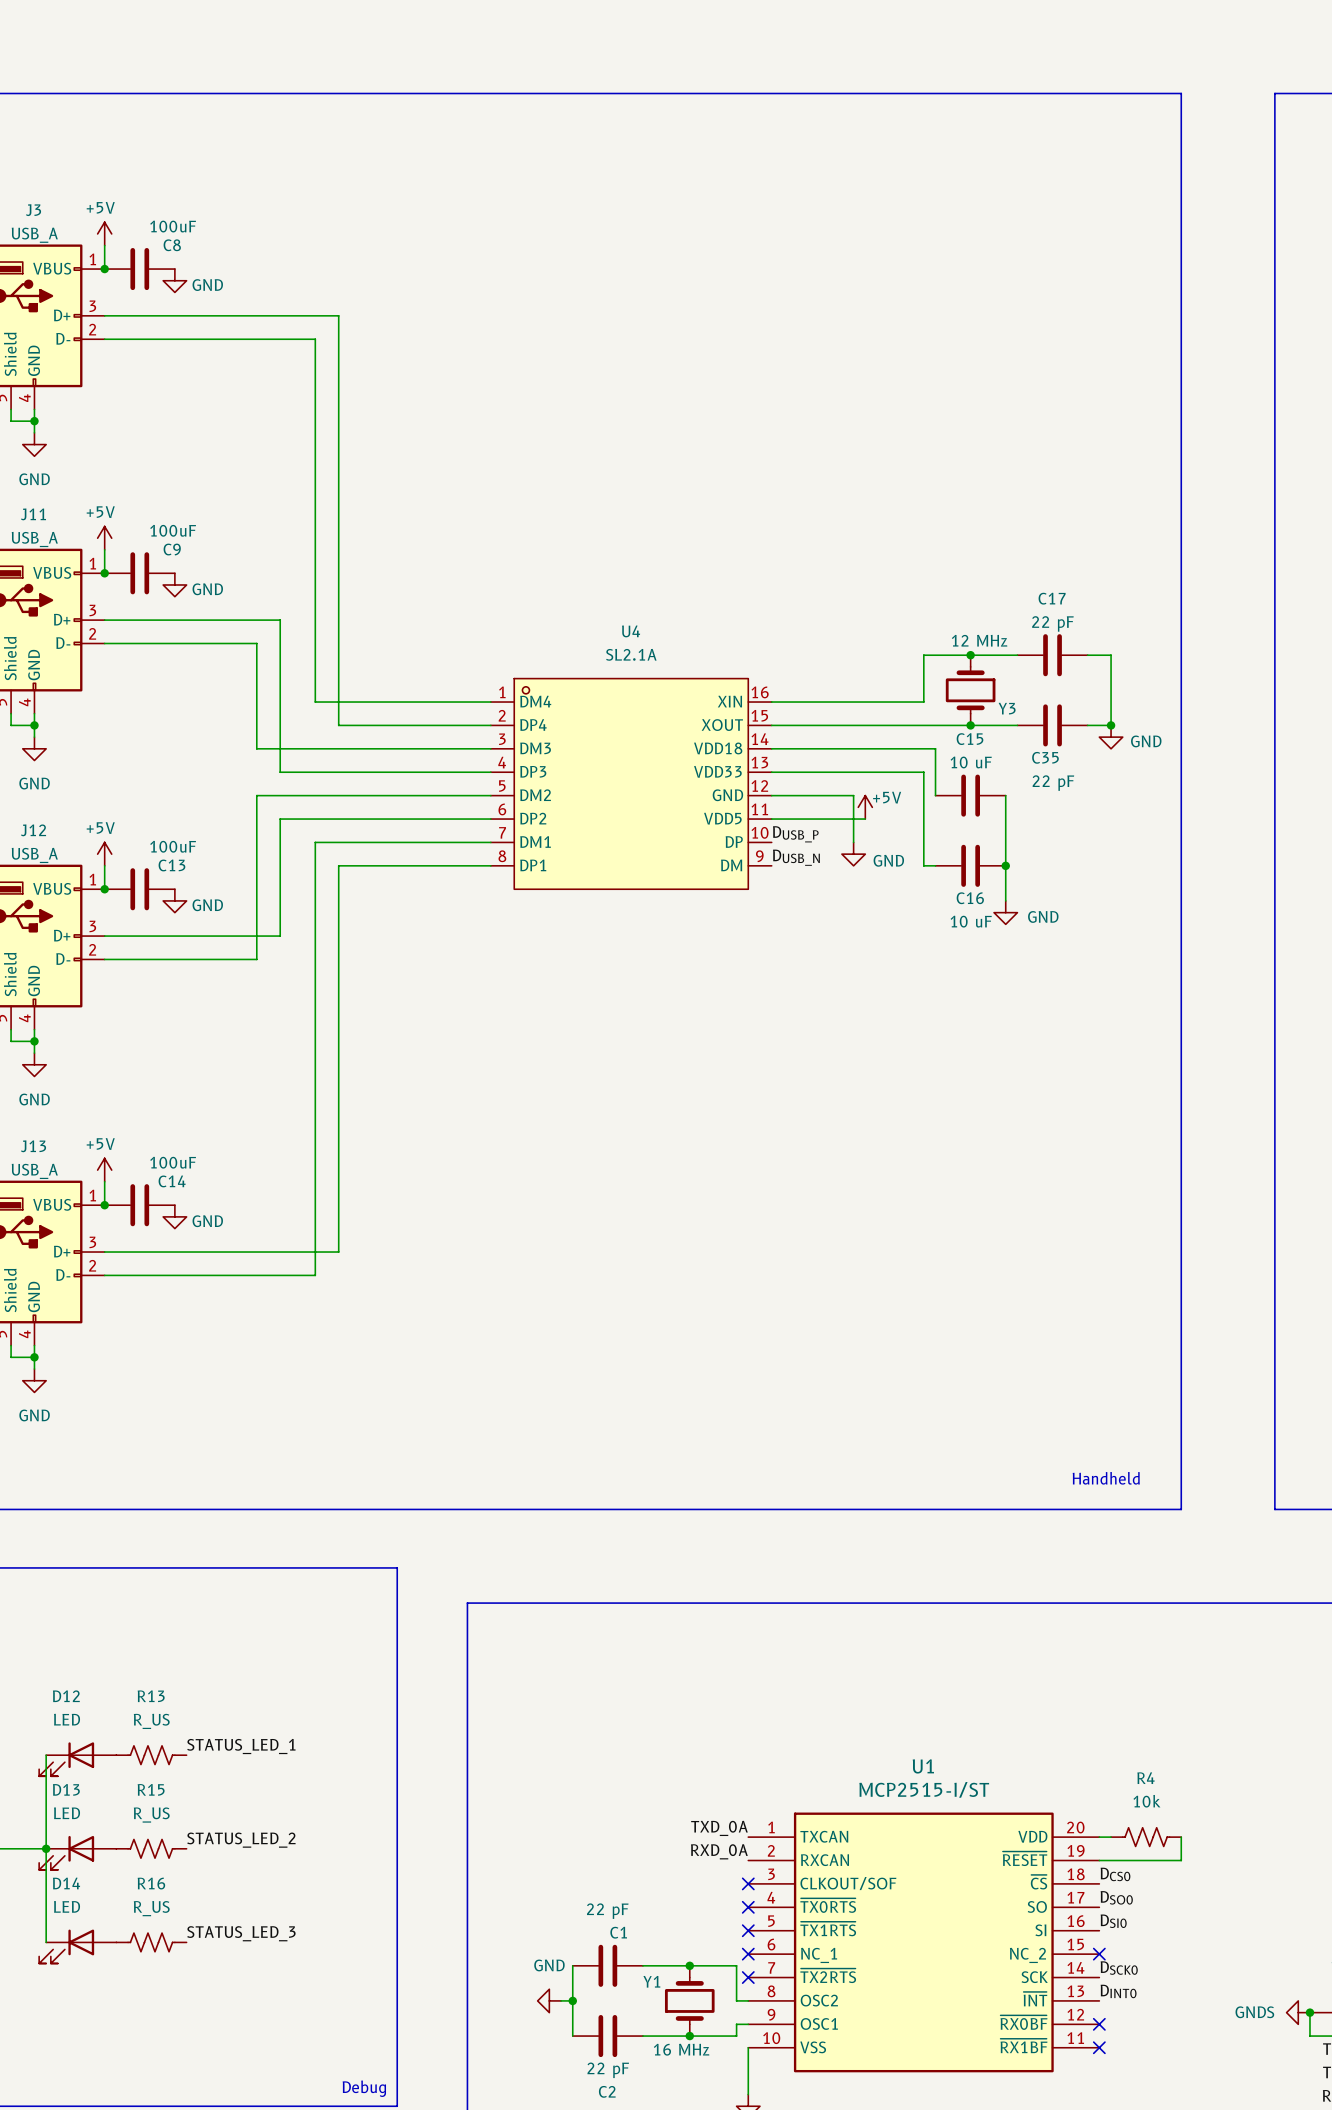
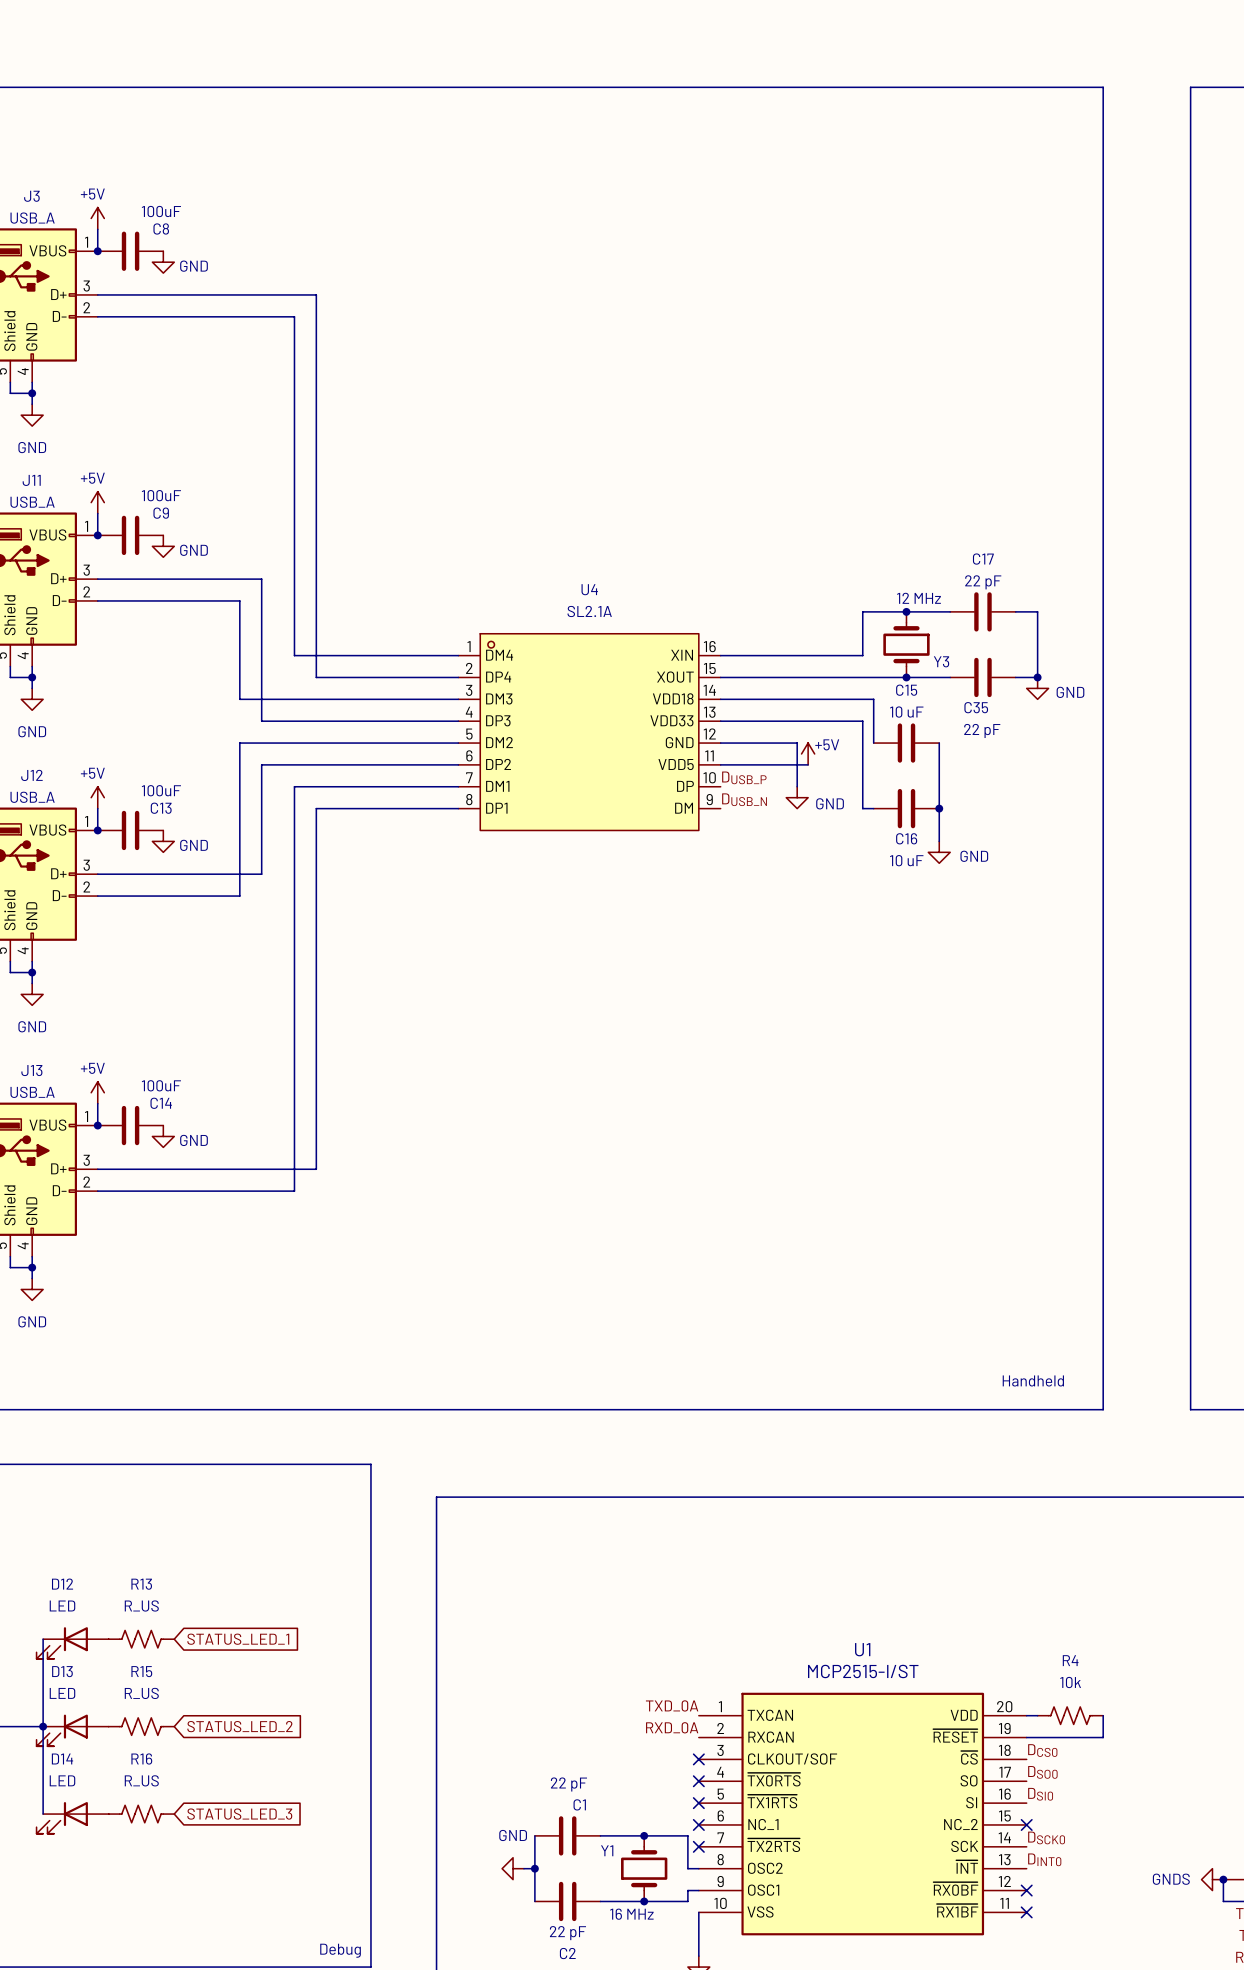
label: STATUS_LED_1 (241, 1746) -> none
global label: none -> STATUS_LED_1 (238, 1639)
label: STATUS_LED_2 (241, 1840) -> none
global label: none -> STATUS_LED_2 (240, 1726)
label: STATUS_LED_3 (241, 1933) -> none
global label: none -> STATUS_LED_3 (239, 1814)

